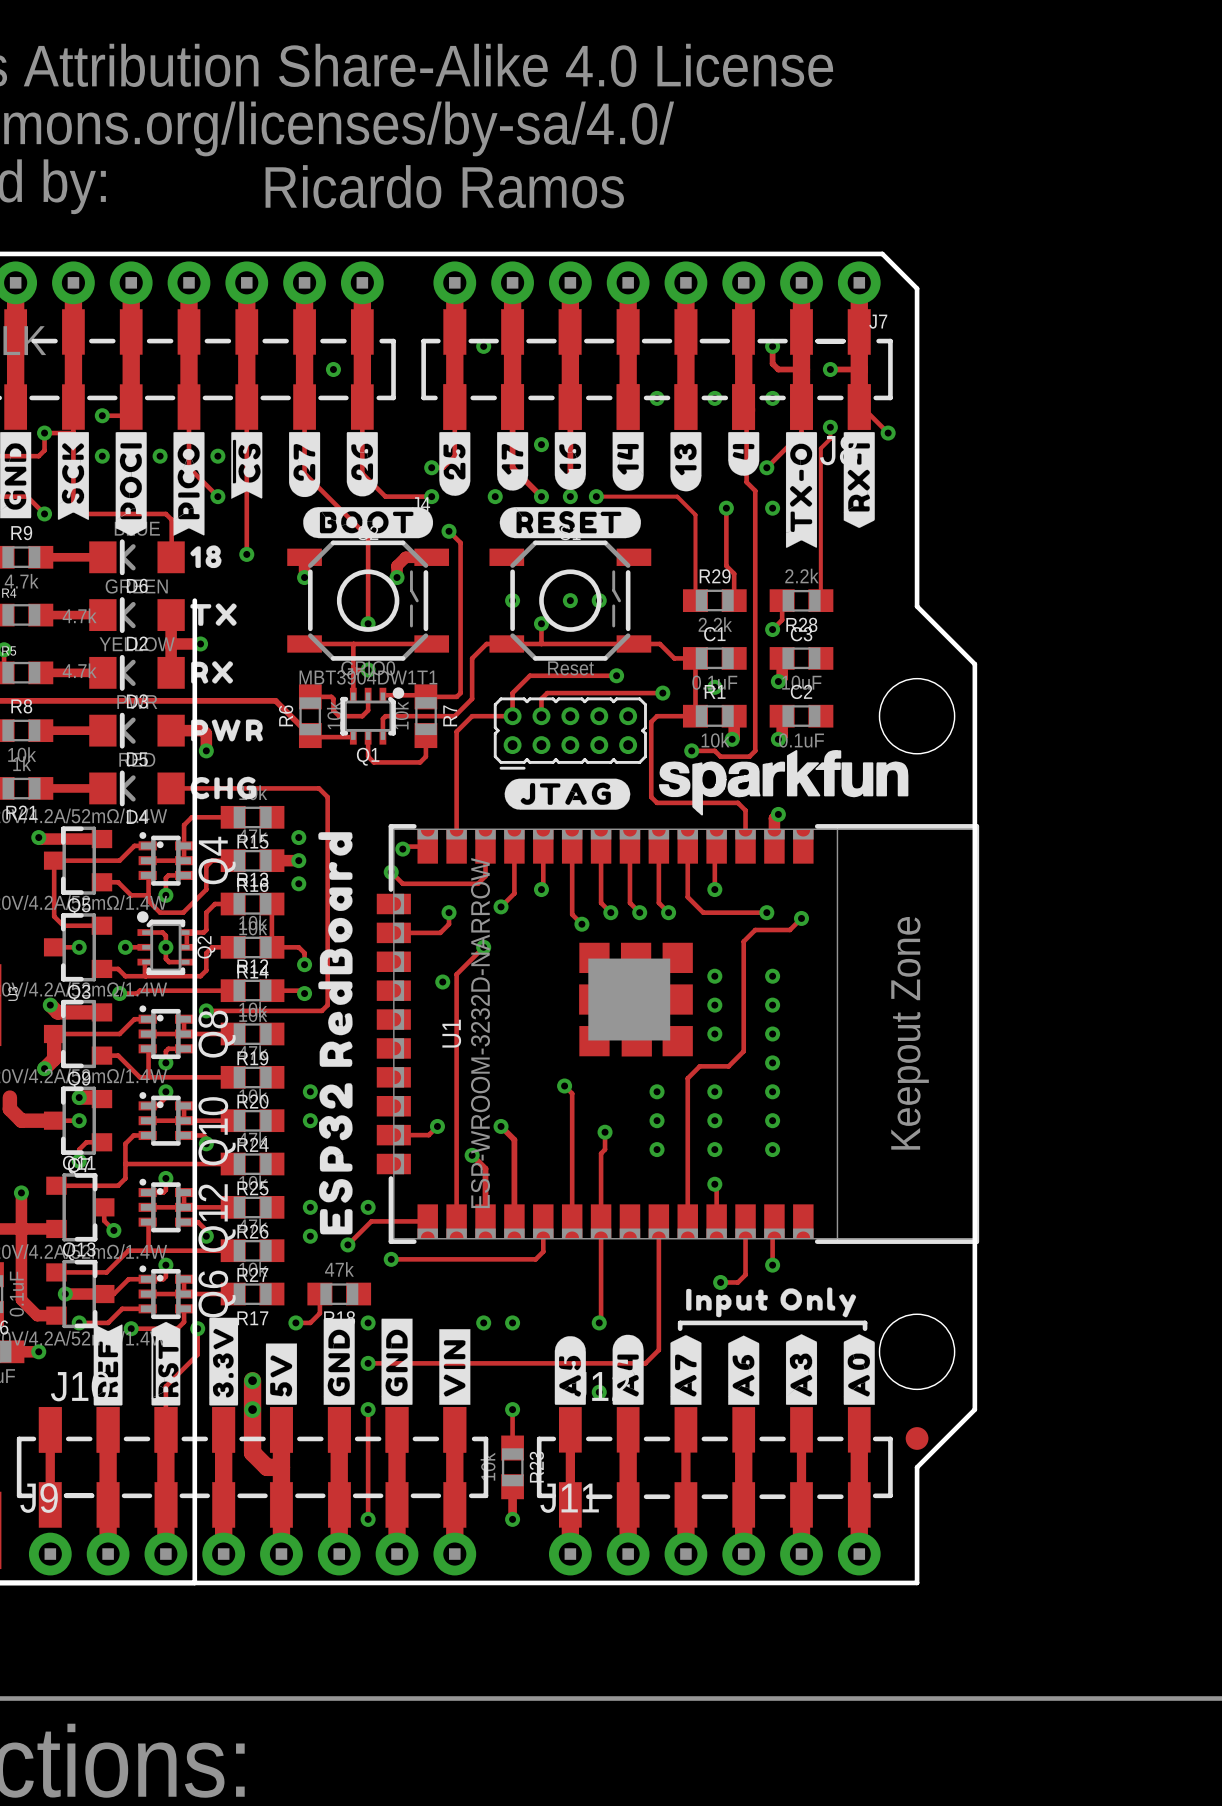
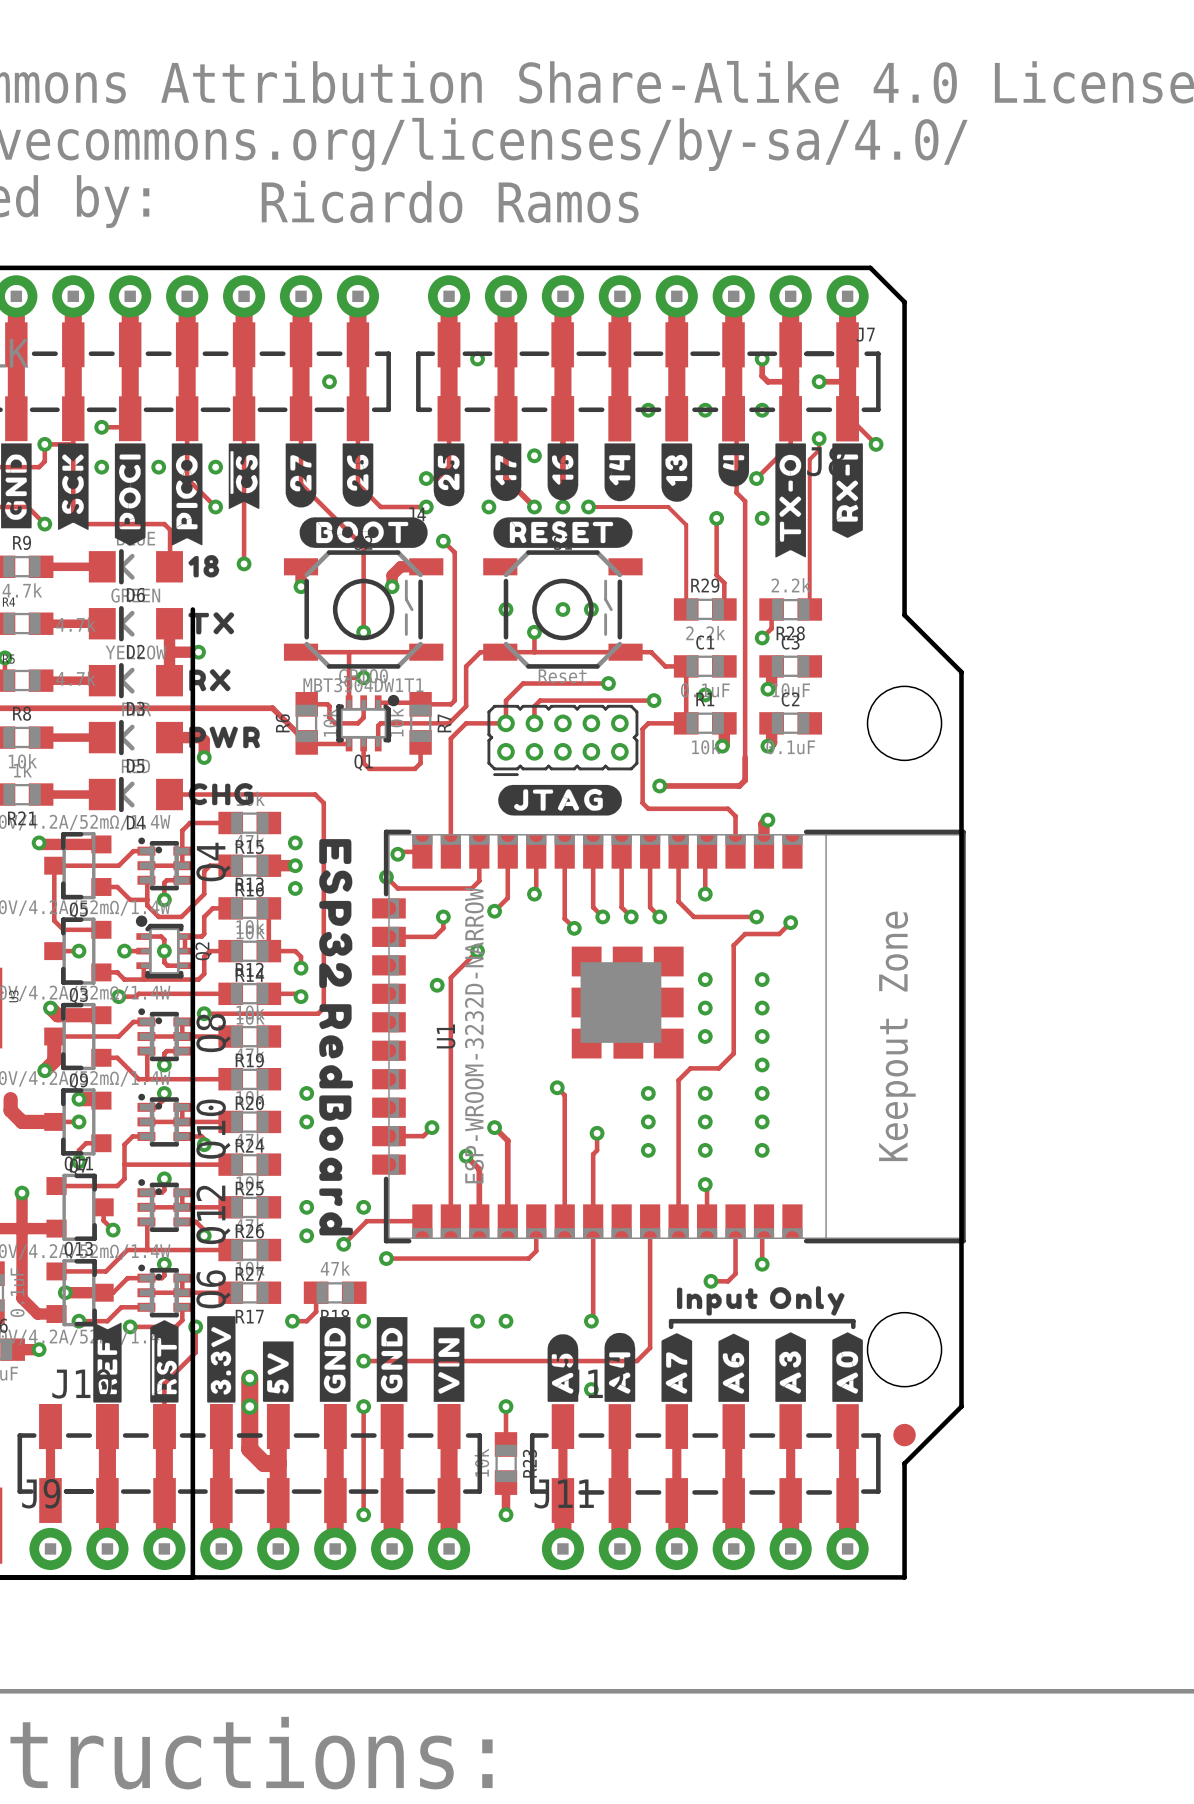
drawing: [658, 750, 909, 816] -> none
track: (691, 750) (714, 750) (720, 756) (749, 756) (755, 750) -> (659, 785) (739, 785) (745, 780) (745, 757)
via position: (691, 750) -> (659, 785)
drawing: [318, 832, 353, 1235] -> none
drawing: none -> [319, 839, 353, 1236]

